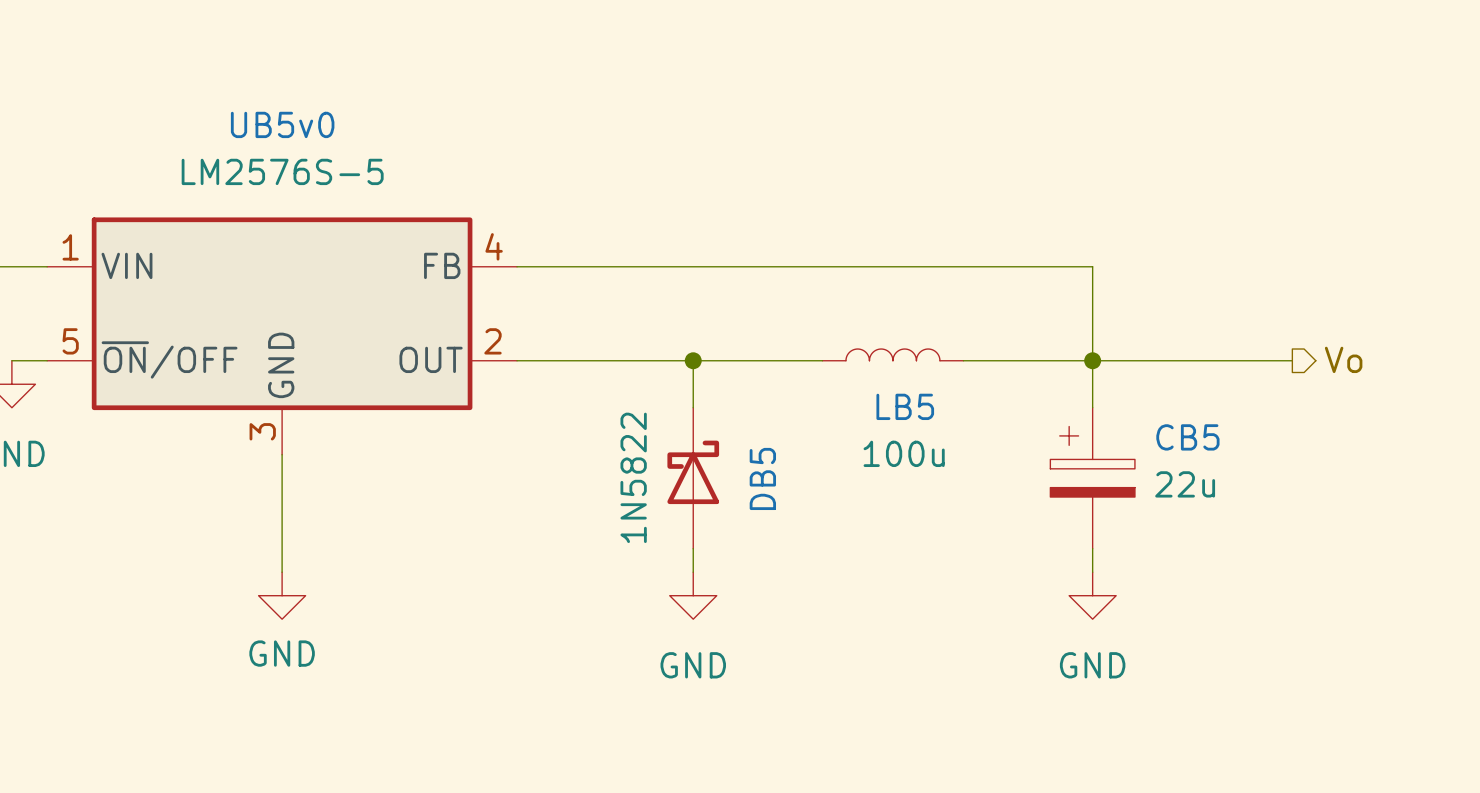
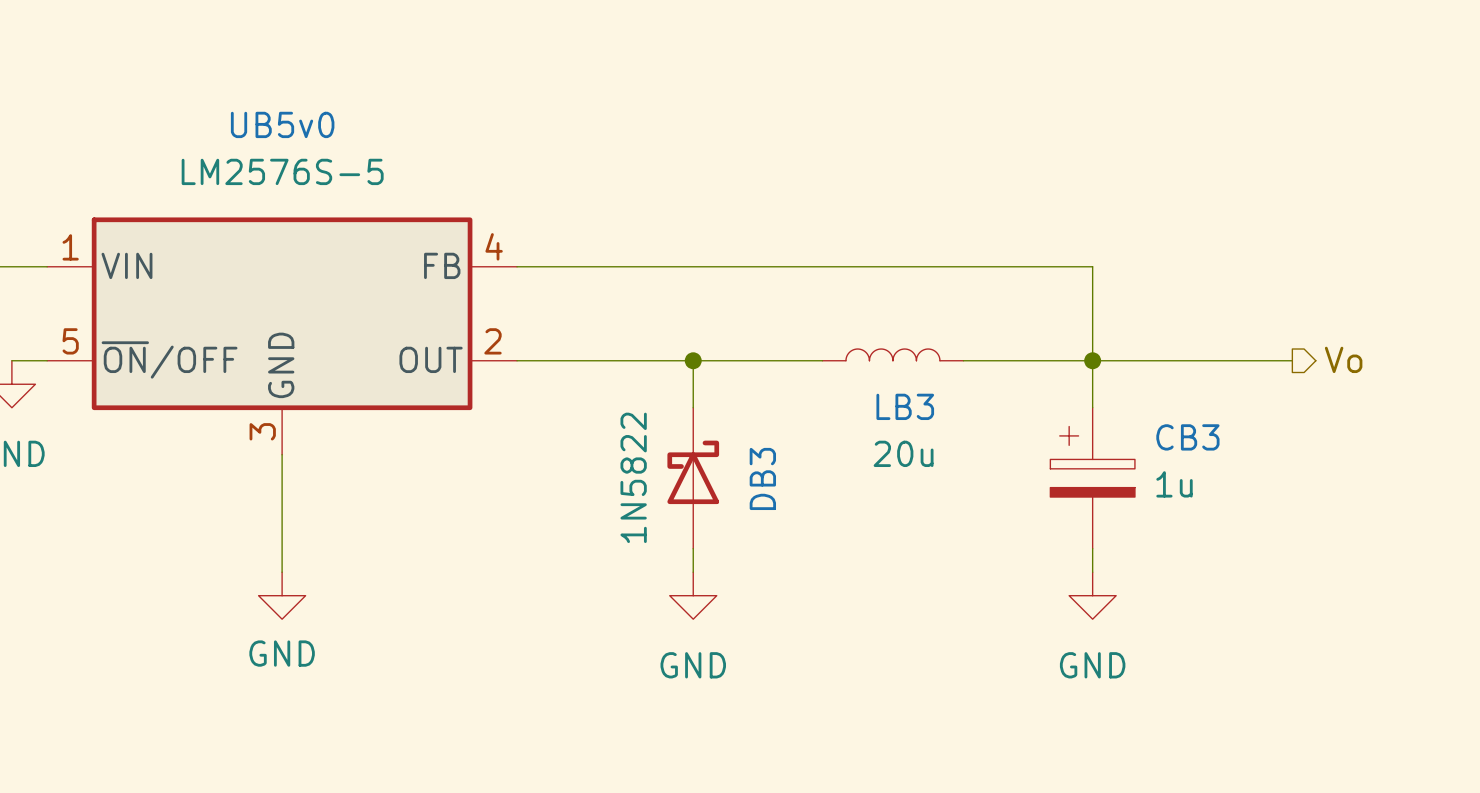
LB5 name: LB5 (905, 406) -> LB3 (905, 406)
CB5 name: CB5 (1187, 437) -> CB3 (1187, 437)
LB5 value: 100u (904, 453) -> 20u (903, 453)
DB5 name: DB5 (762, 478) -> DB3 (762, 478)
CB5 value: 22u (1185, 484) -> 1u (1174, 484)

